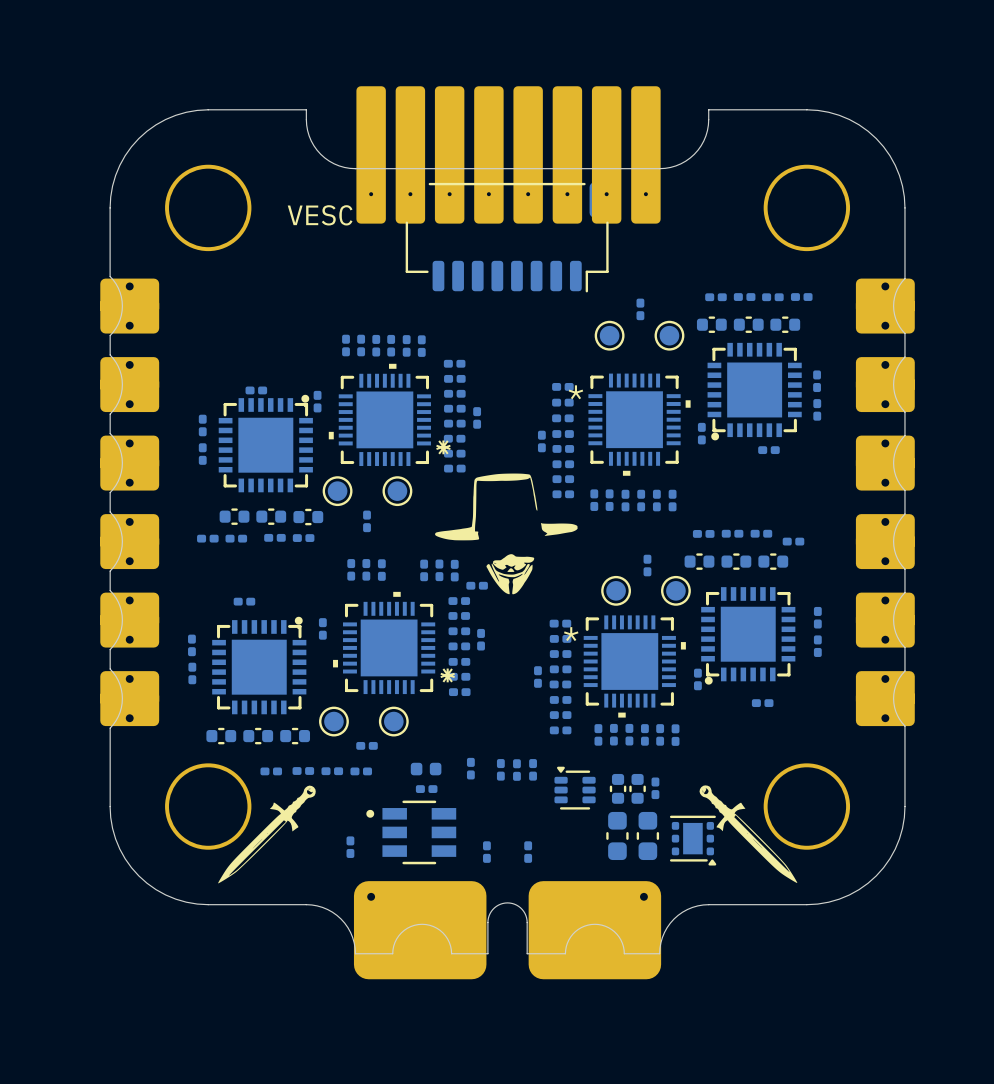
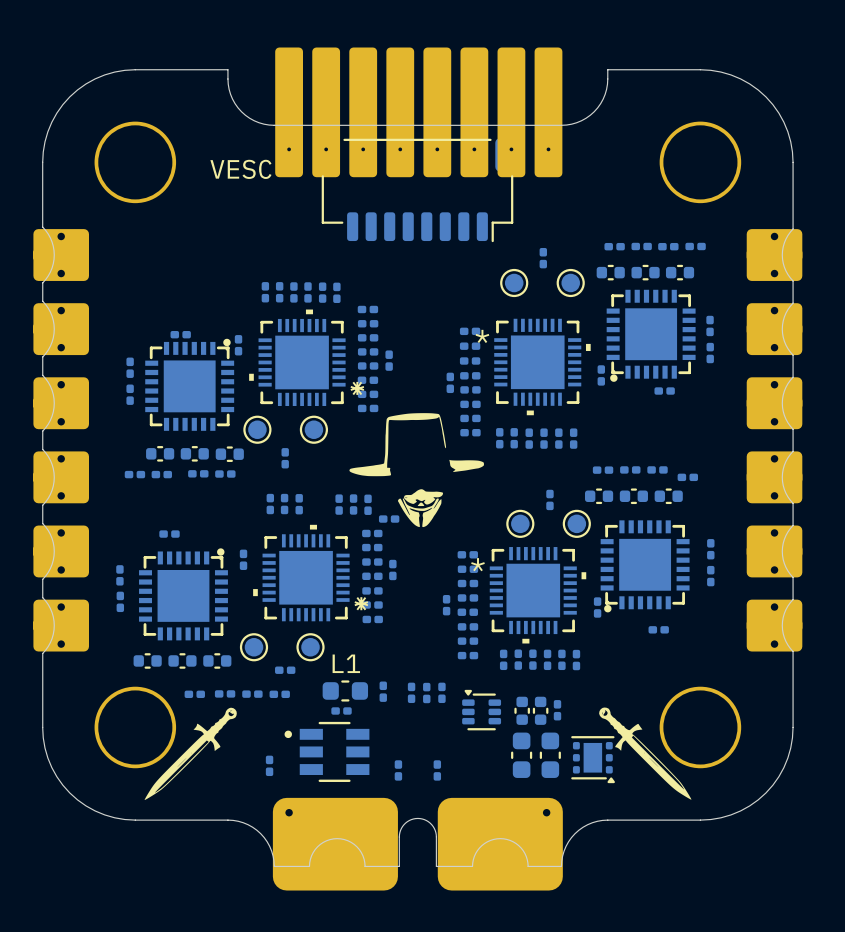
L1: none -> (345, 690)
part: (426, 769) -> none

